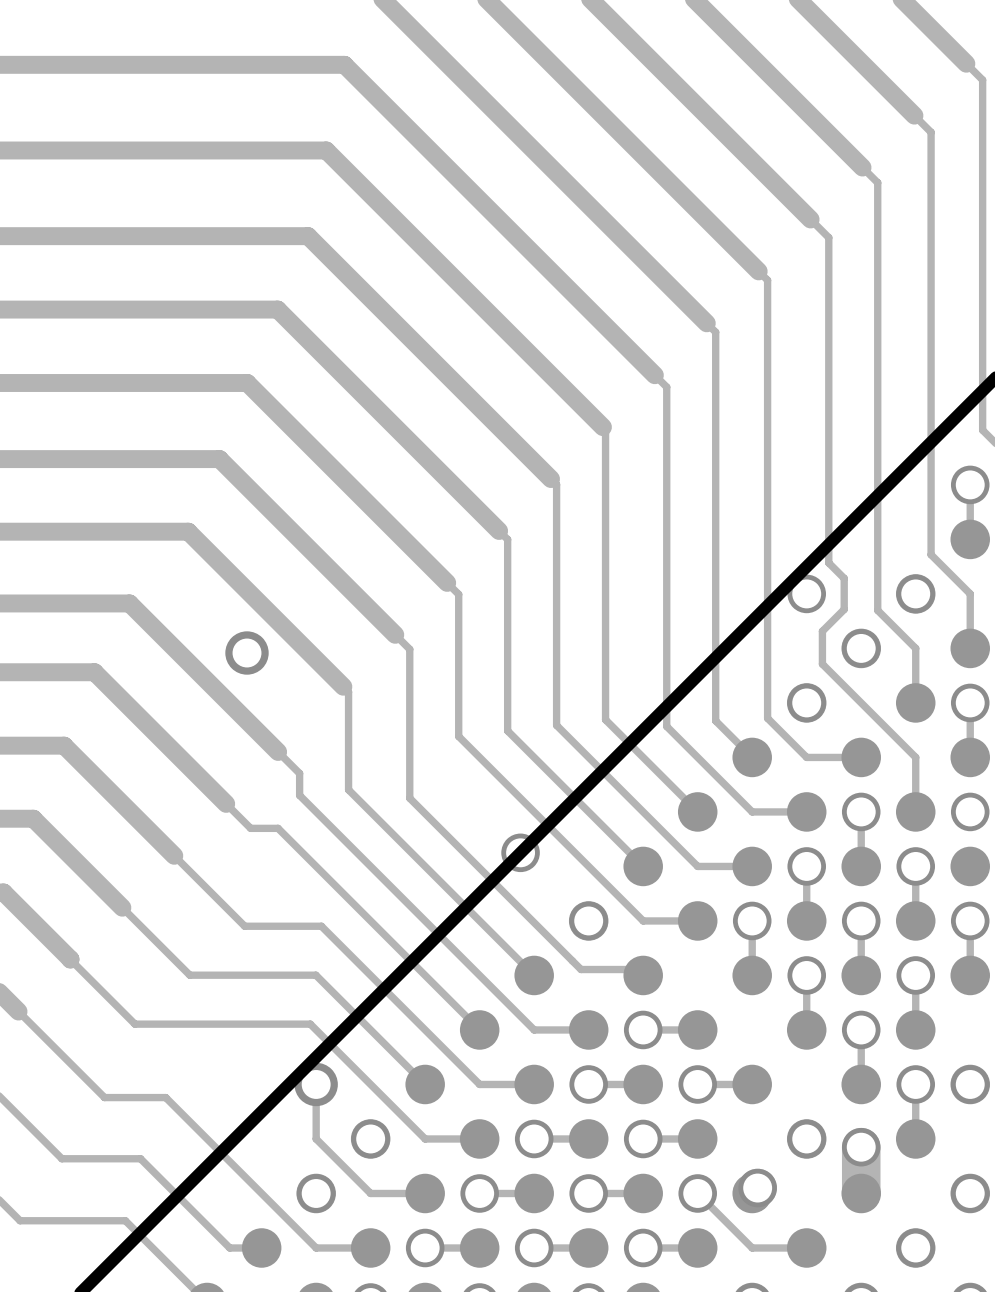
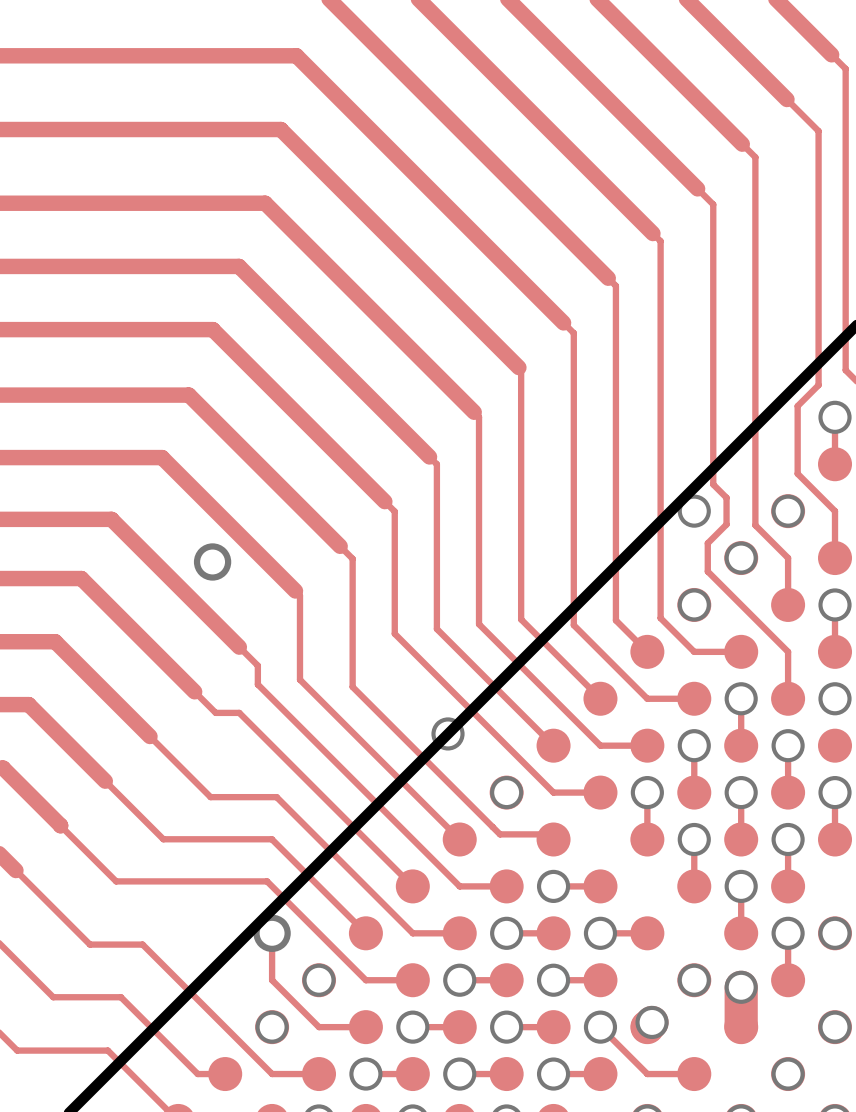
track: (931, 132) (931, 554) -> (801, 113) (818, 131) (818, 385) (797, 406) (797, 473) (801, 477)

